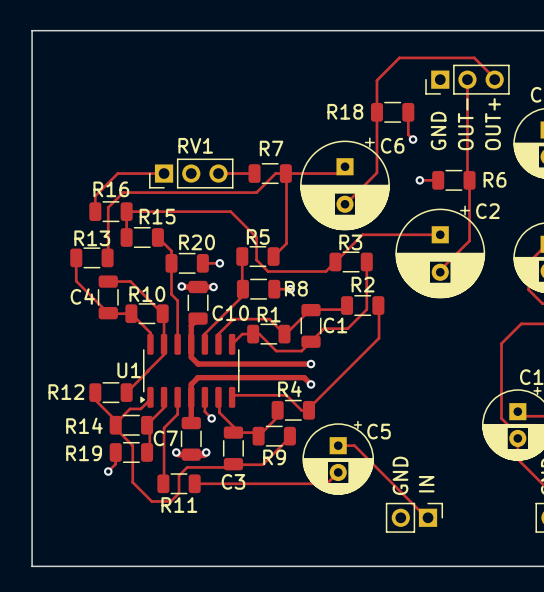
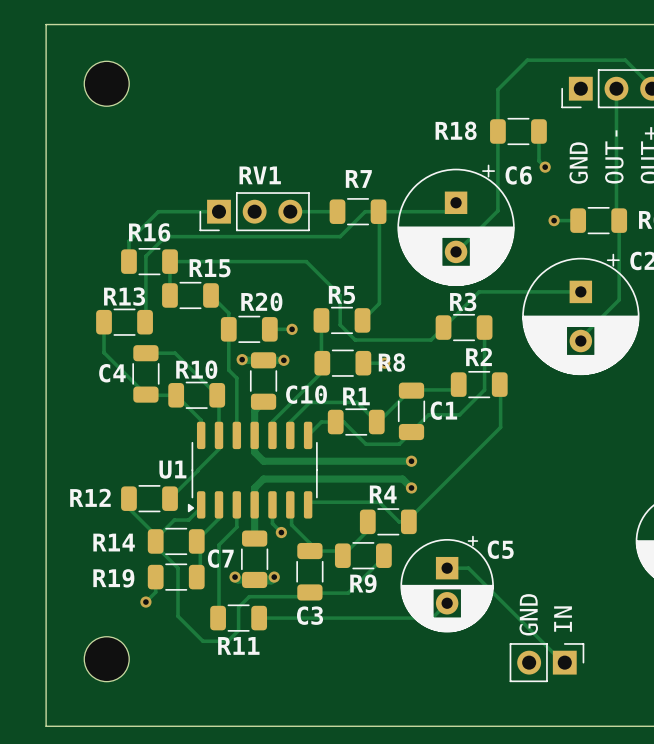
part: none -> (106, 83)
part: none -> (106, 659)

